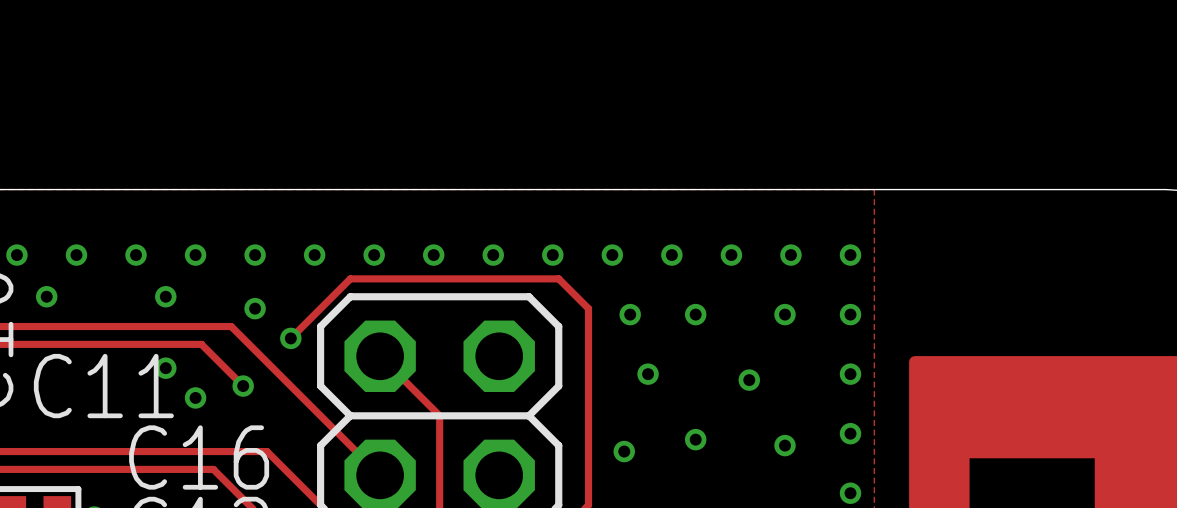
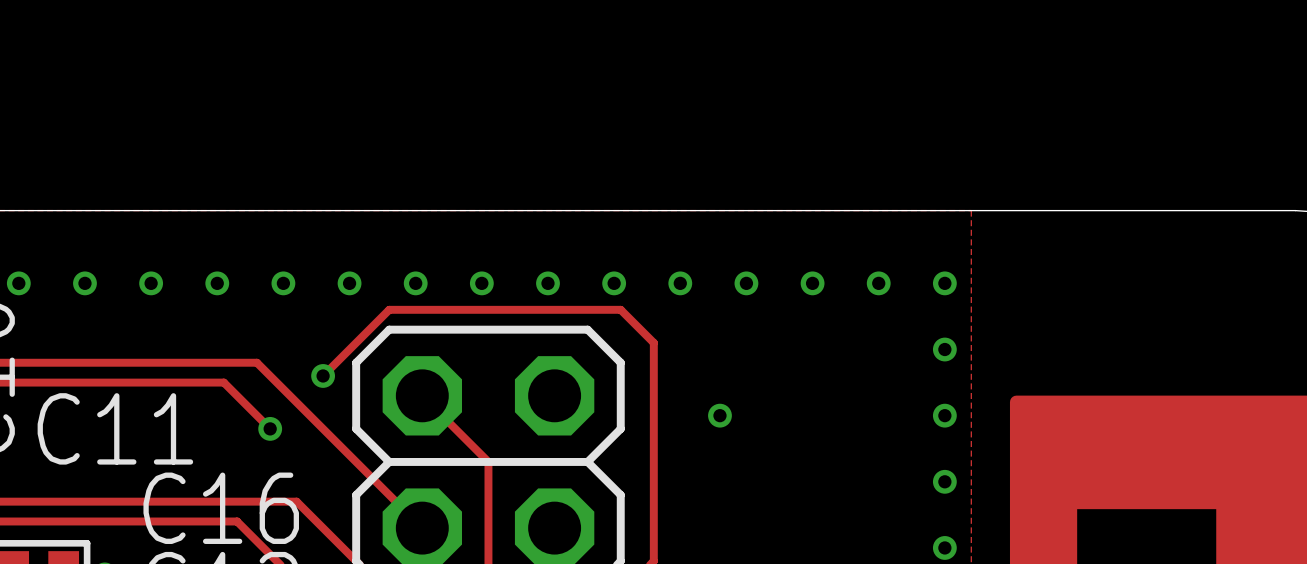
via: (46, 296) -> none
via: (165, 296) -> none
via: (255, 308) -> none
via: (630, 314) -> none
via: (695, 314) -> none
via: (785, 314) -> none
via: (165, 368) -> none
via: (749, 380) -> none
via: (195, 397) -> none
via: (695, 439) -> none
via: (785, 445) -> none
via: (624, 451) -> none

